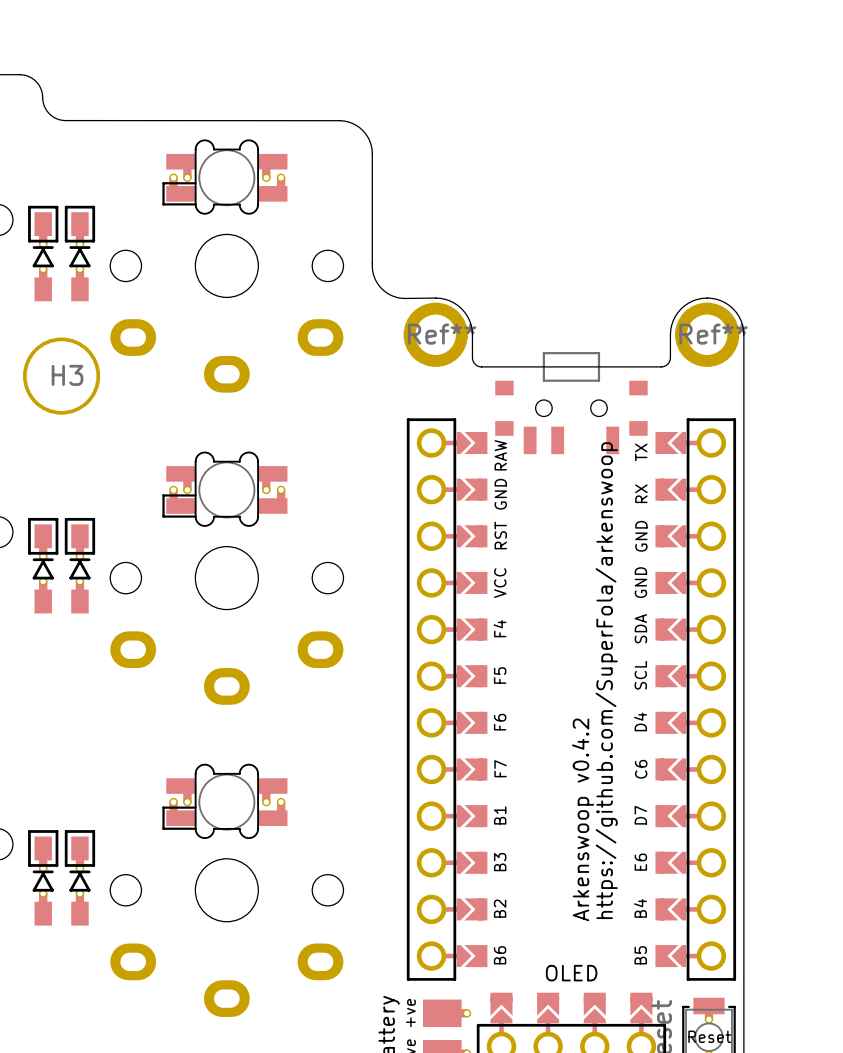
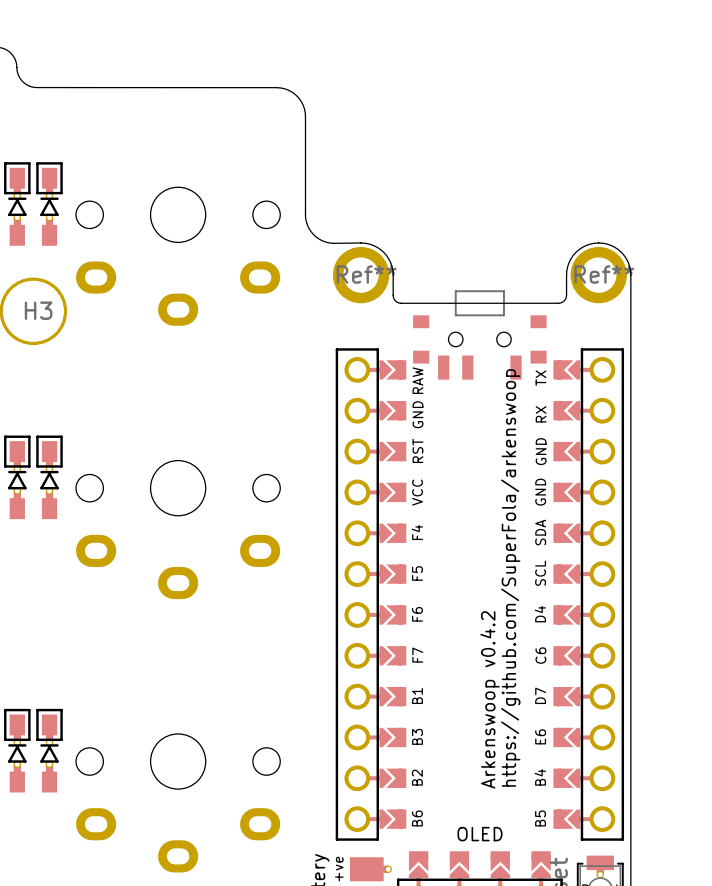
part: (224, 177) -> none
part: (224, 489) -> none
part: (224, 801) -> none

